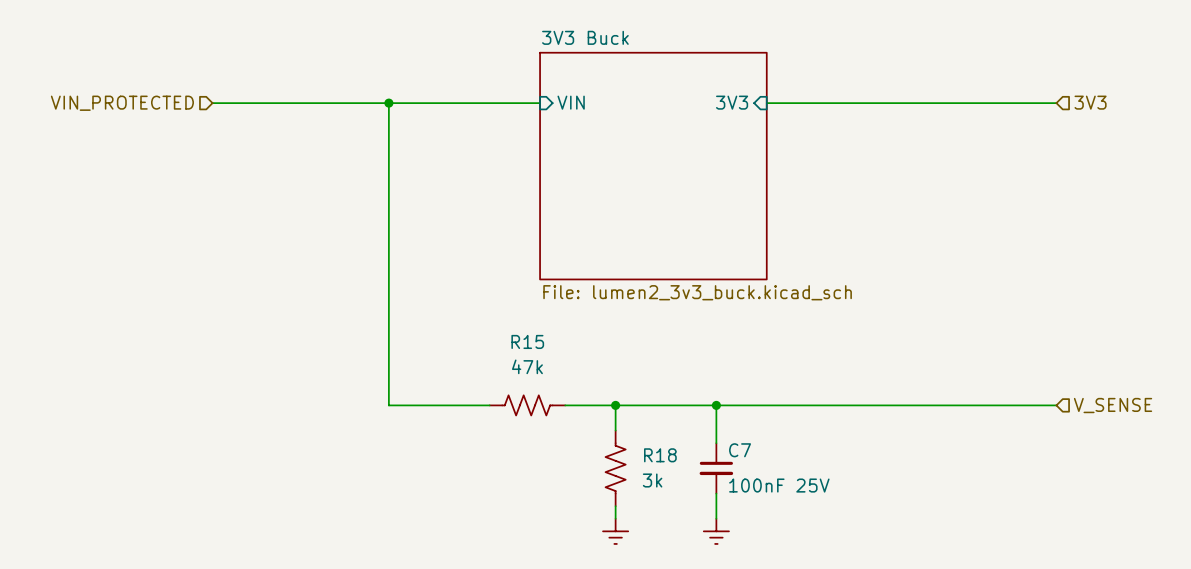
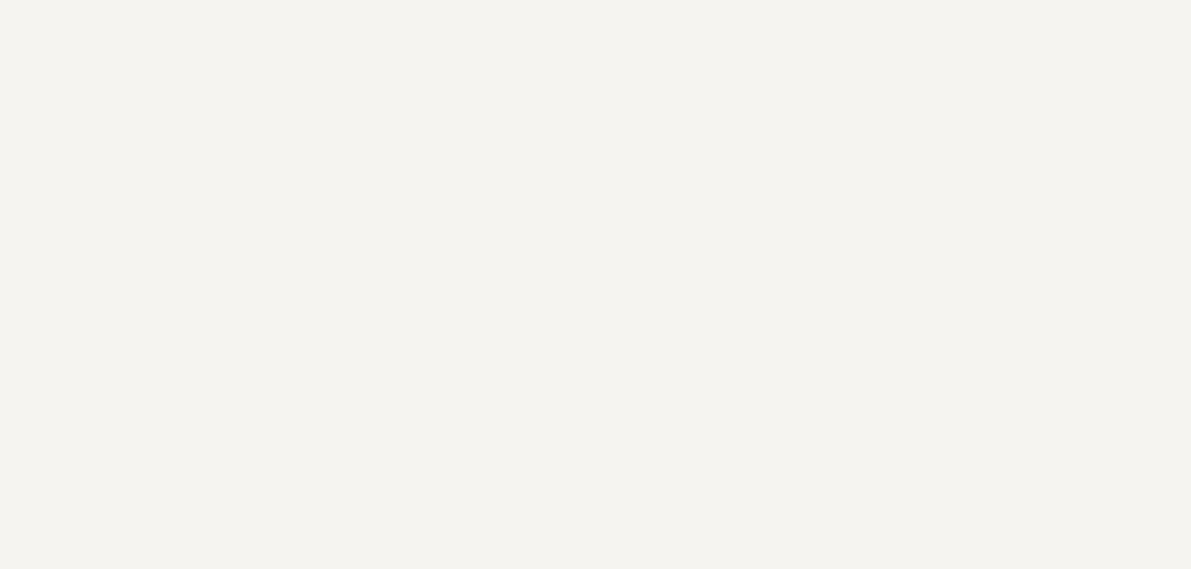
sheet pin: VIN (571, 102) -> none
sheet pin: 3V3 (732, 102) -> none
hierarchical label: 3V3 (1090, 102) -> none
hierarchical label: VIN_PROTECTED (122, 103) -> none
wire: (212, 103) (540, 103) -> none
wire: (388, 103) (388, 405) (489, 405) -> none
junction: (388, 103) -> none
wire: (766, 103) (1056, 103) -> none
sheet 3V3 Buck: File: lumen2_3v3_buck.kicad_sch (653, 166) -> none
R15: 47k (527, 405) -> none
wire: (565, 405) (1056, 405) -> none
wire: (615, 405) (615, 430) -> none
junction: (615, 405) -> none
wire: (716, 405) (716, 443) -> none
junction: (716, 405) -> none
hierarchical label: V_SENSE (1113, 405) -> none
R18: 3k (615, 468) -> none
C7: 100nF 25V (716, 468) -> none
wire: (716, 493) (716, 518) -> none
wire: (615, 506) (615, 518) -> none
power symbol: (615, 531) -> none
power symbol: (716, 531) -> none

